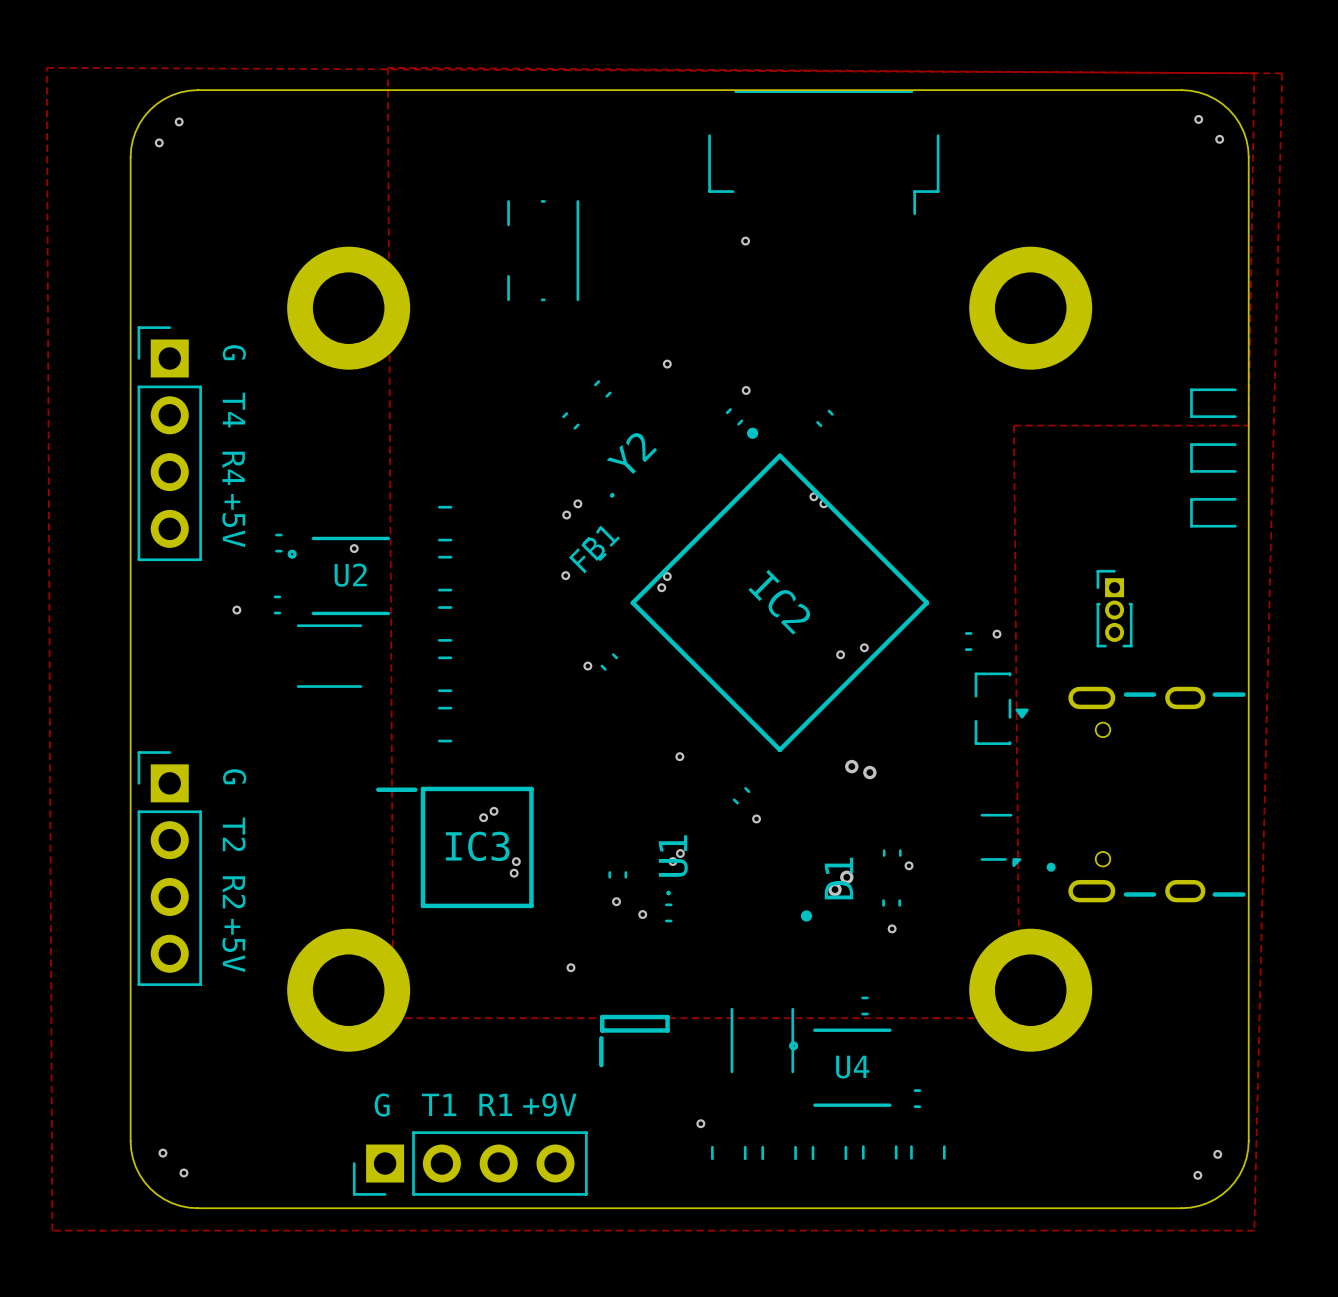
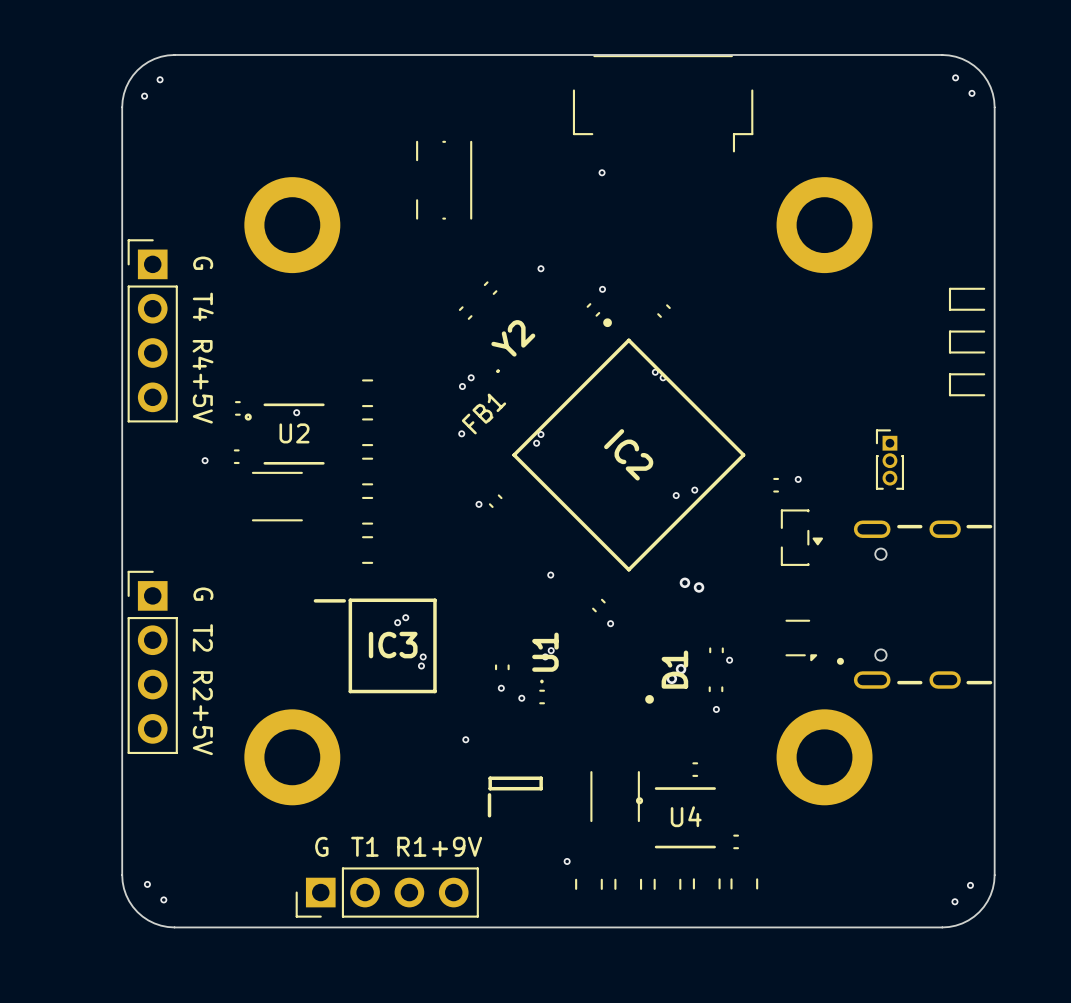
zone outline: (46, 67) (1282, 73) (1254, 1230) (52, 1230) (46, 67) -> none
zone outline: (387, 67) (393, 1018) (1019, 1018) (1013, 425) (1248, 425) (1254, 73) (387, 67) -> none

